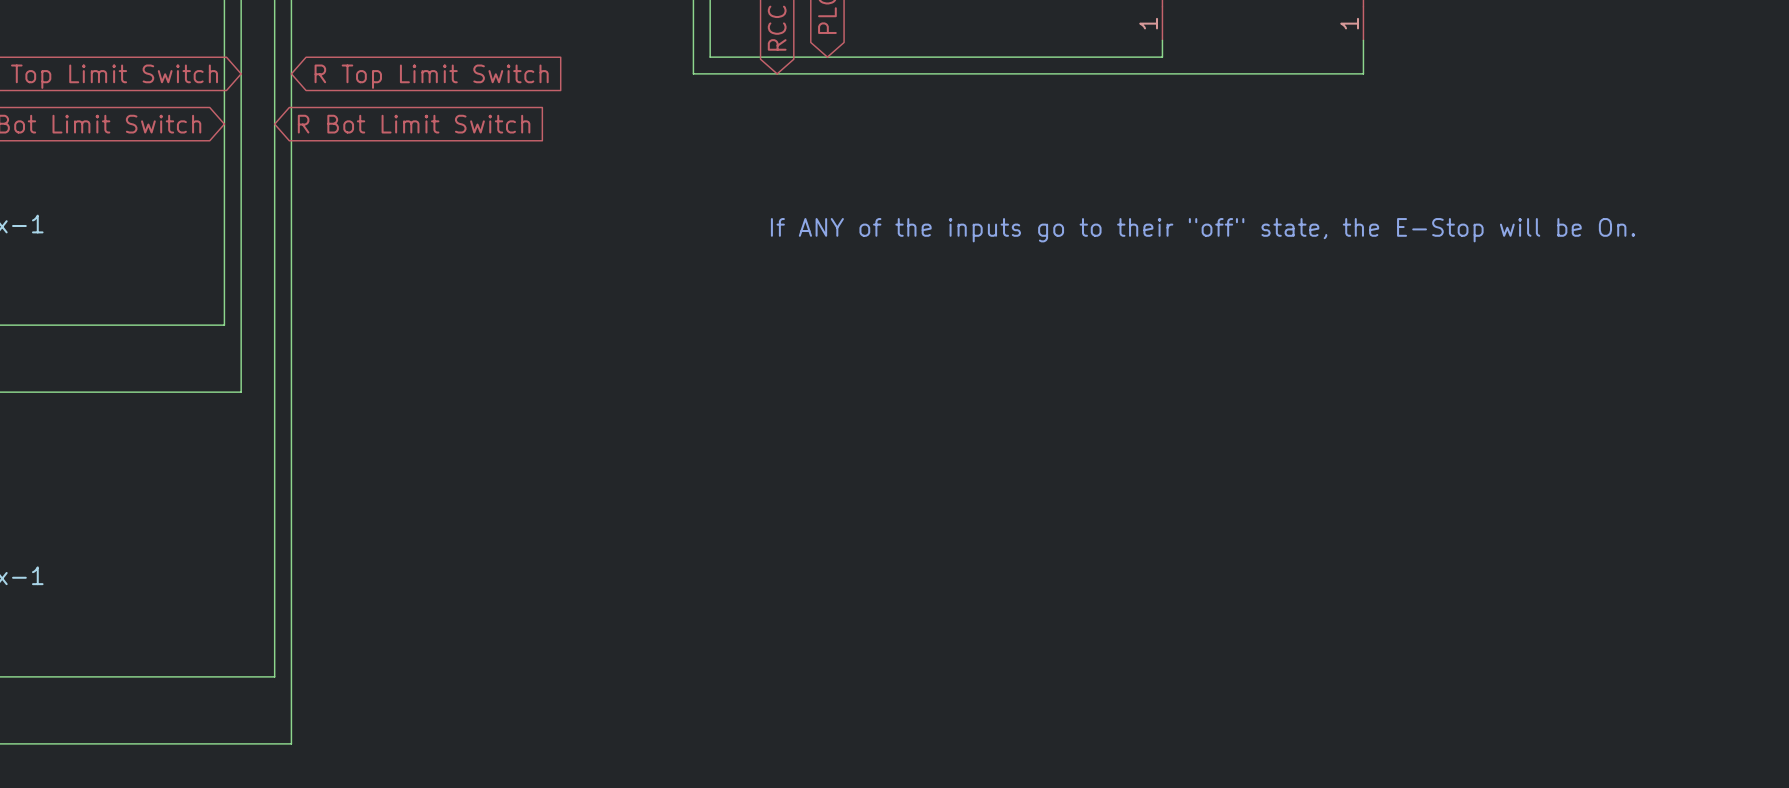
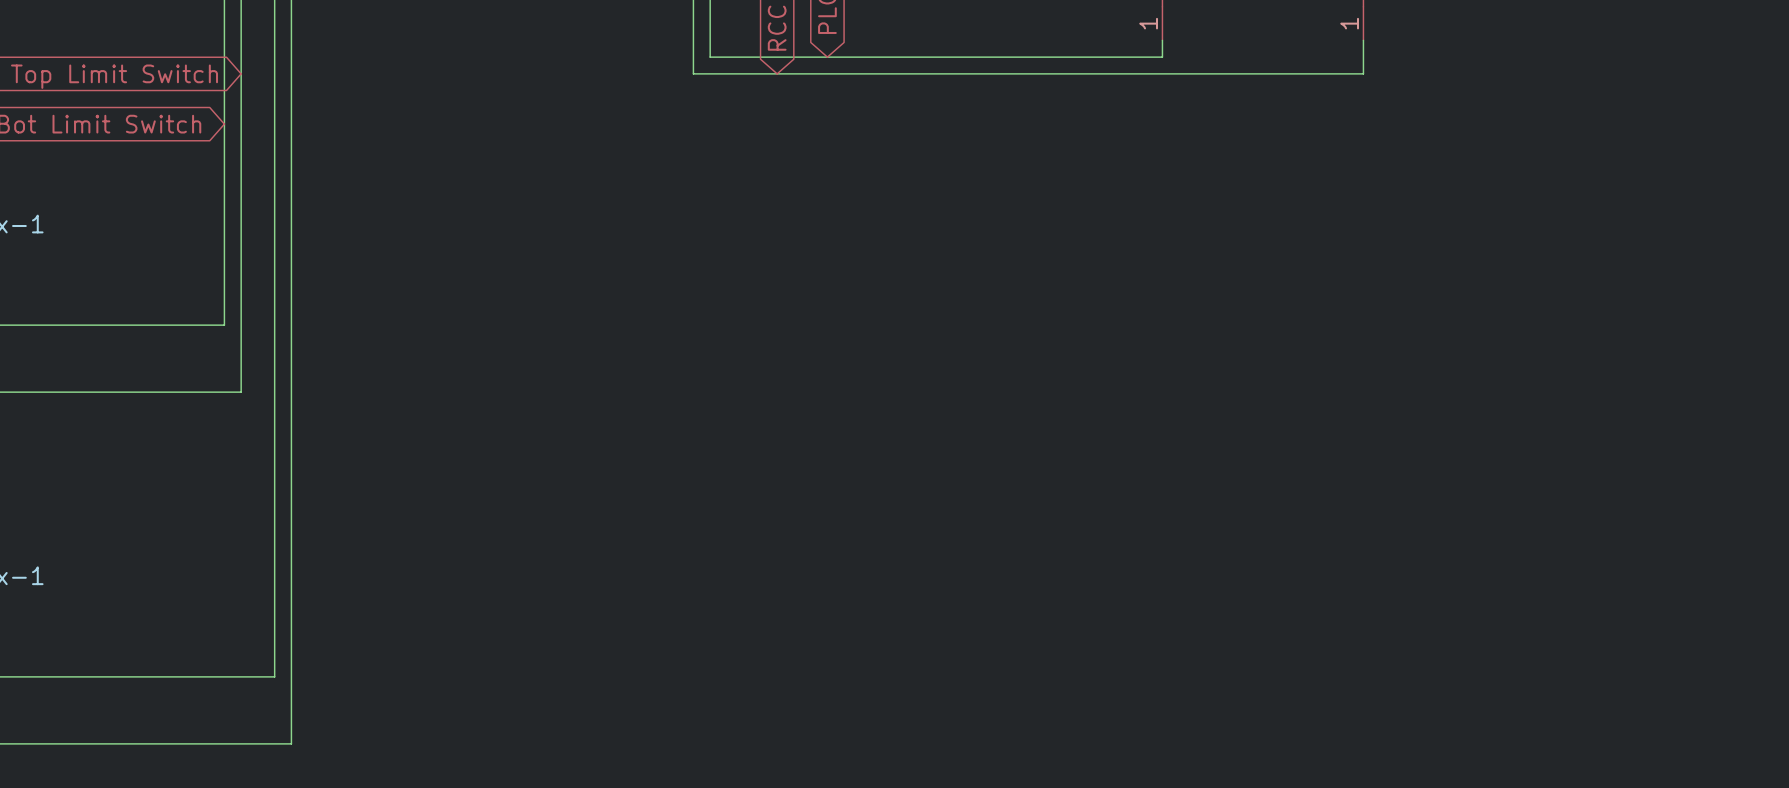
global label: R Top Limit Switch (431, 76) -> none
global label: R Bot Limit Switch (414, 124) -> none
text: If ANY of the inputs go to their "off" state, the E-Stop will be On. (1203, 230) -> none

